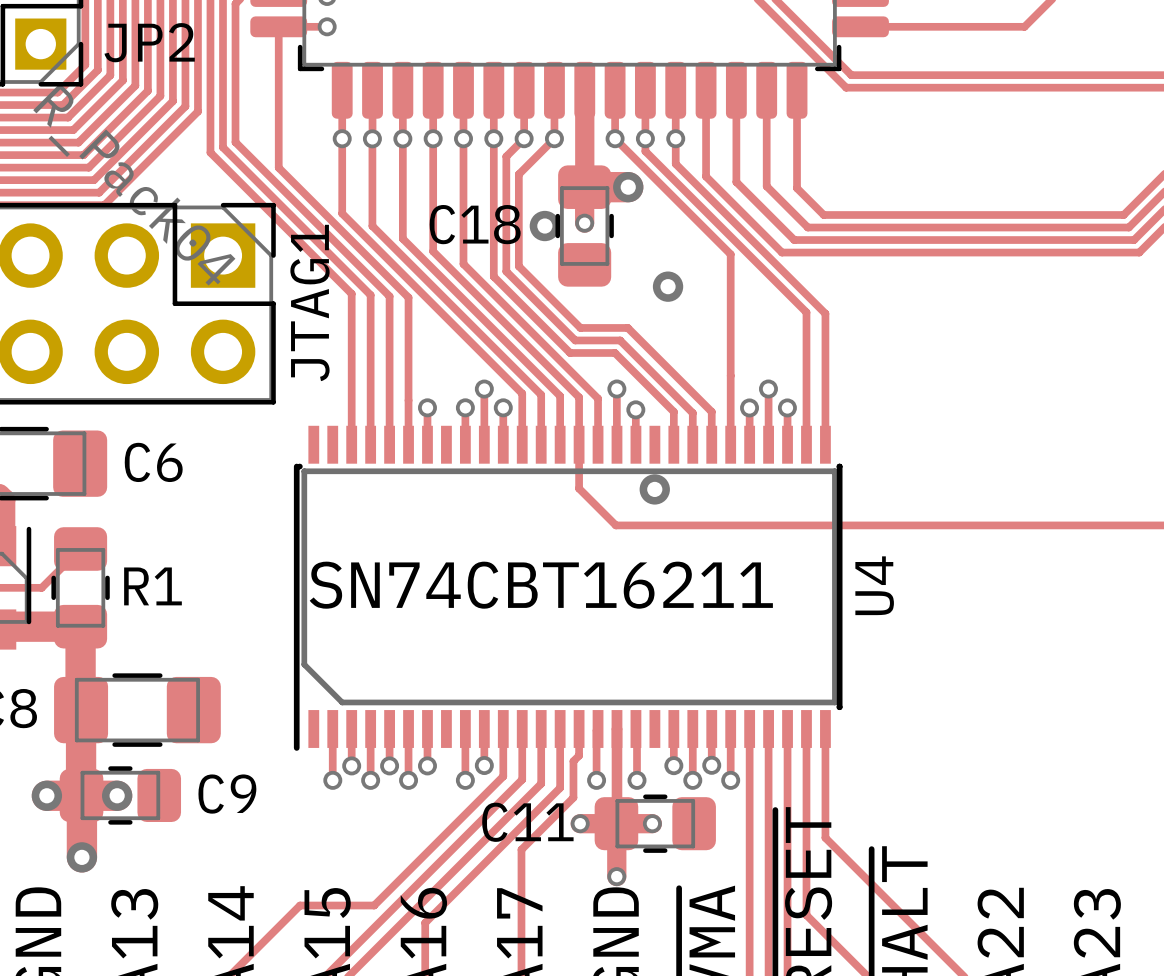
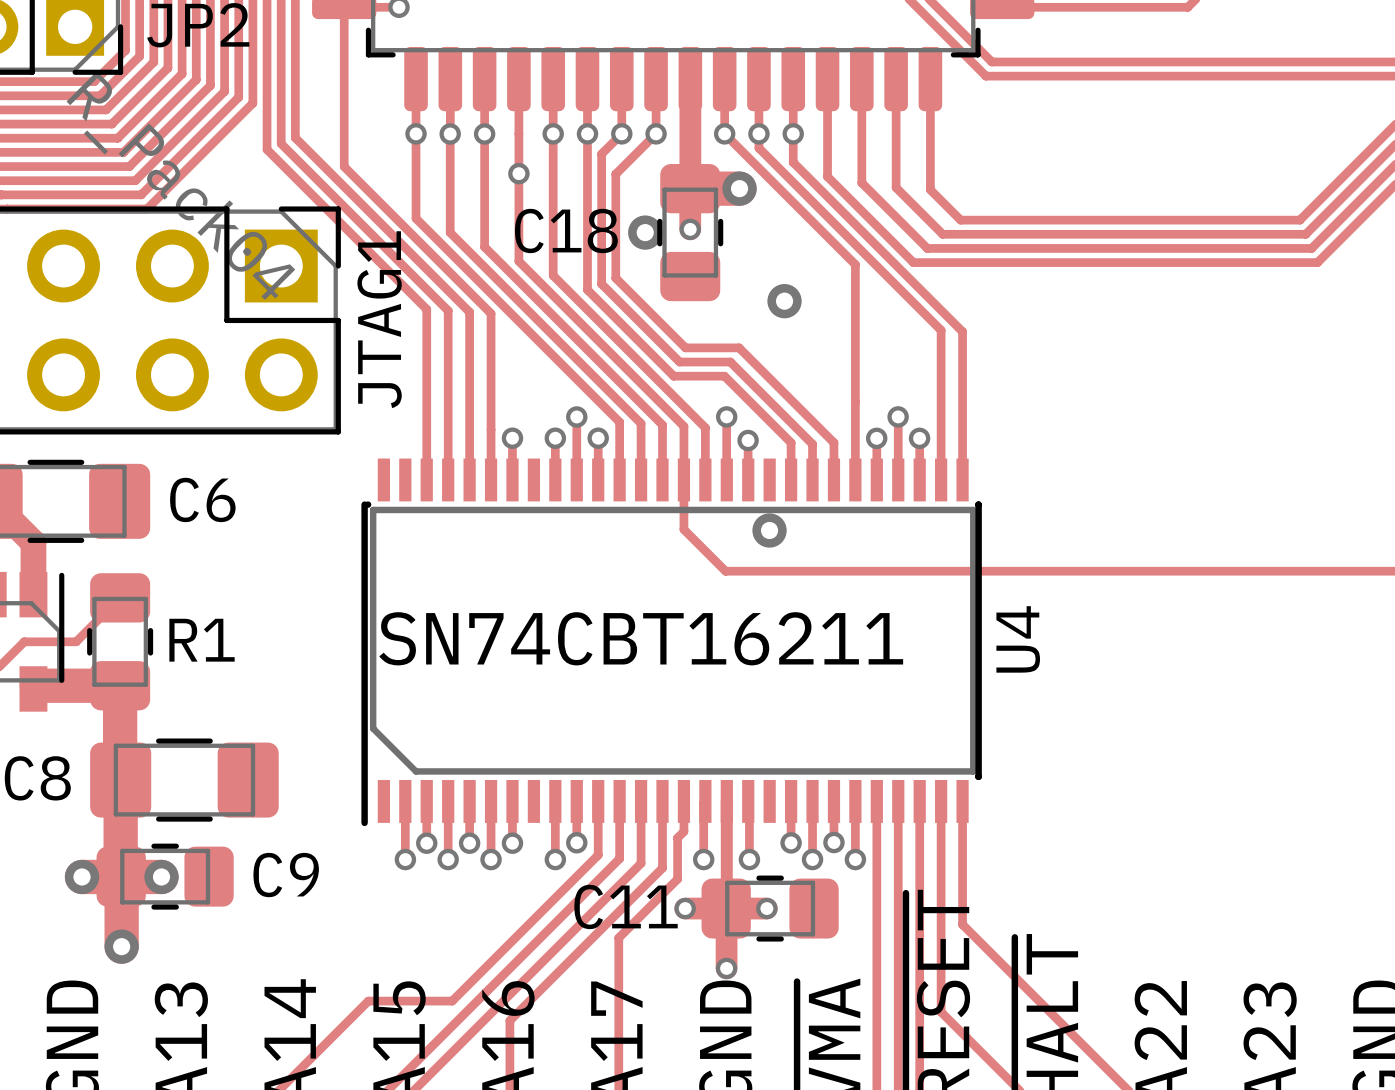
via position: (433, 138) -> (518, 173)

